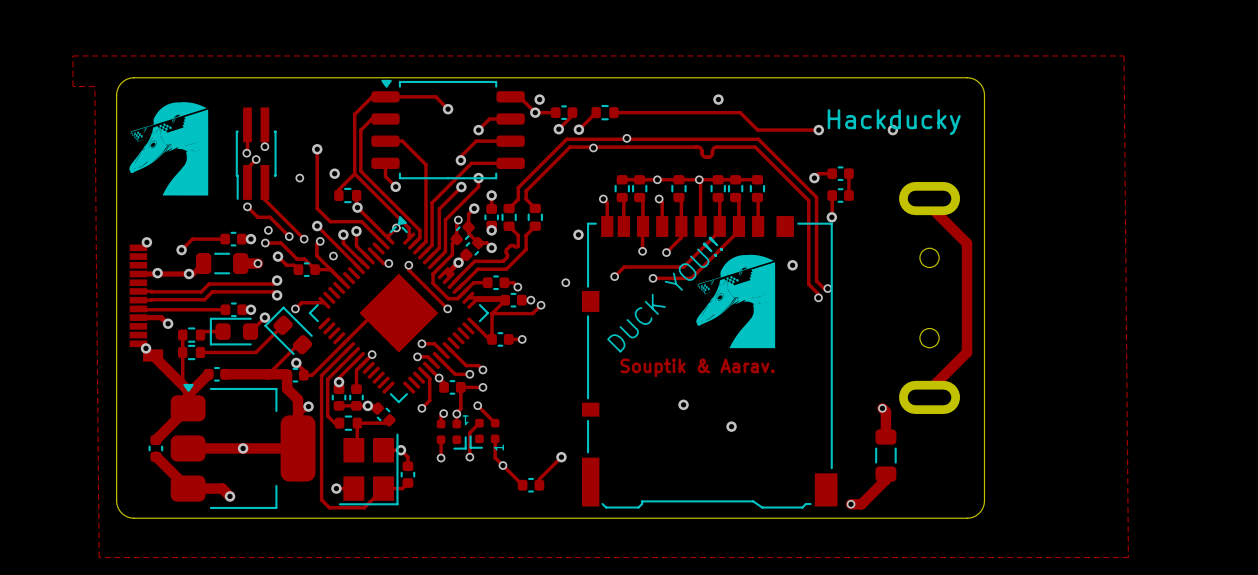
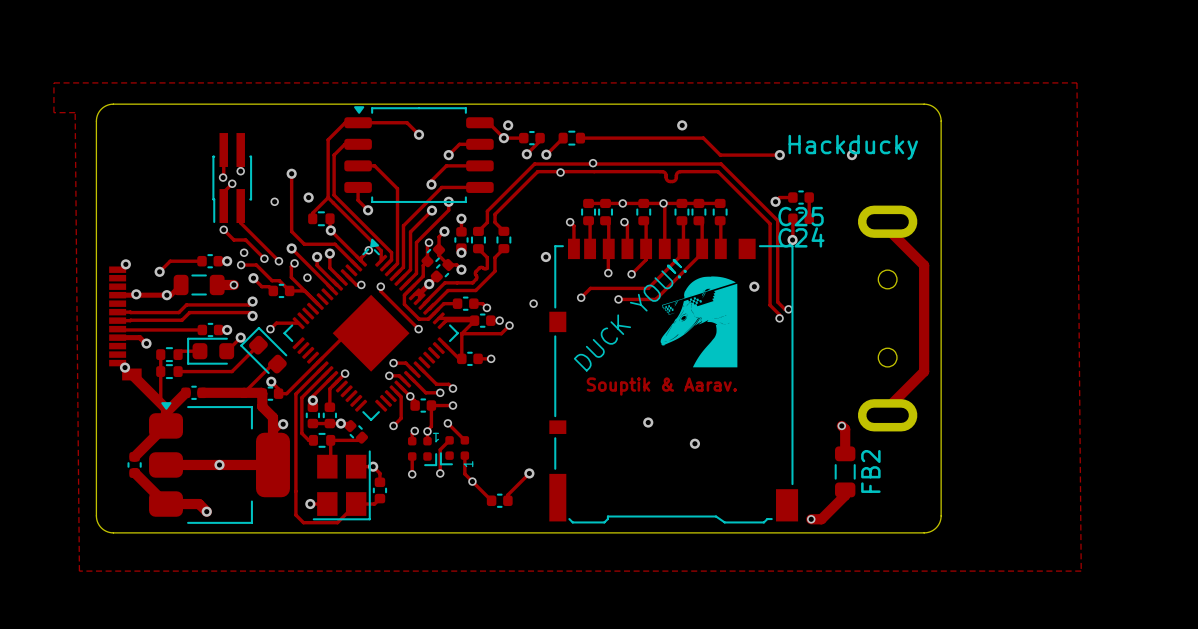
drawing: [129, 102, 209, 196] -> none
C25 name: none -> C25 (801, 216)
C24 name: none -> C24 (801, 237)
FB2 name: none -> FB2 (870, 471)

